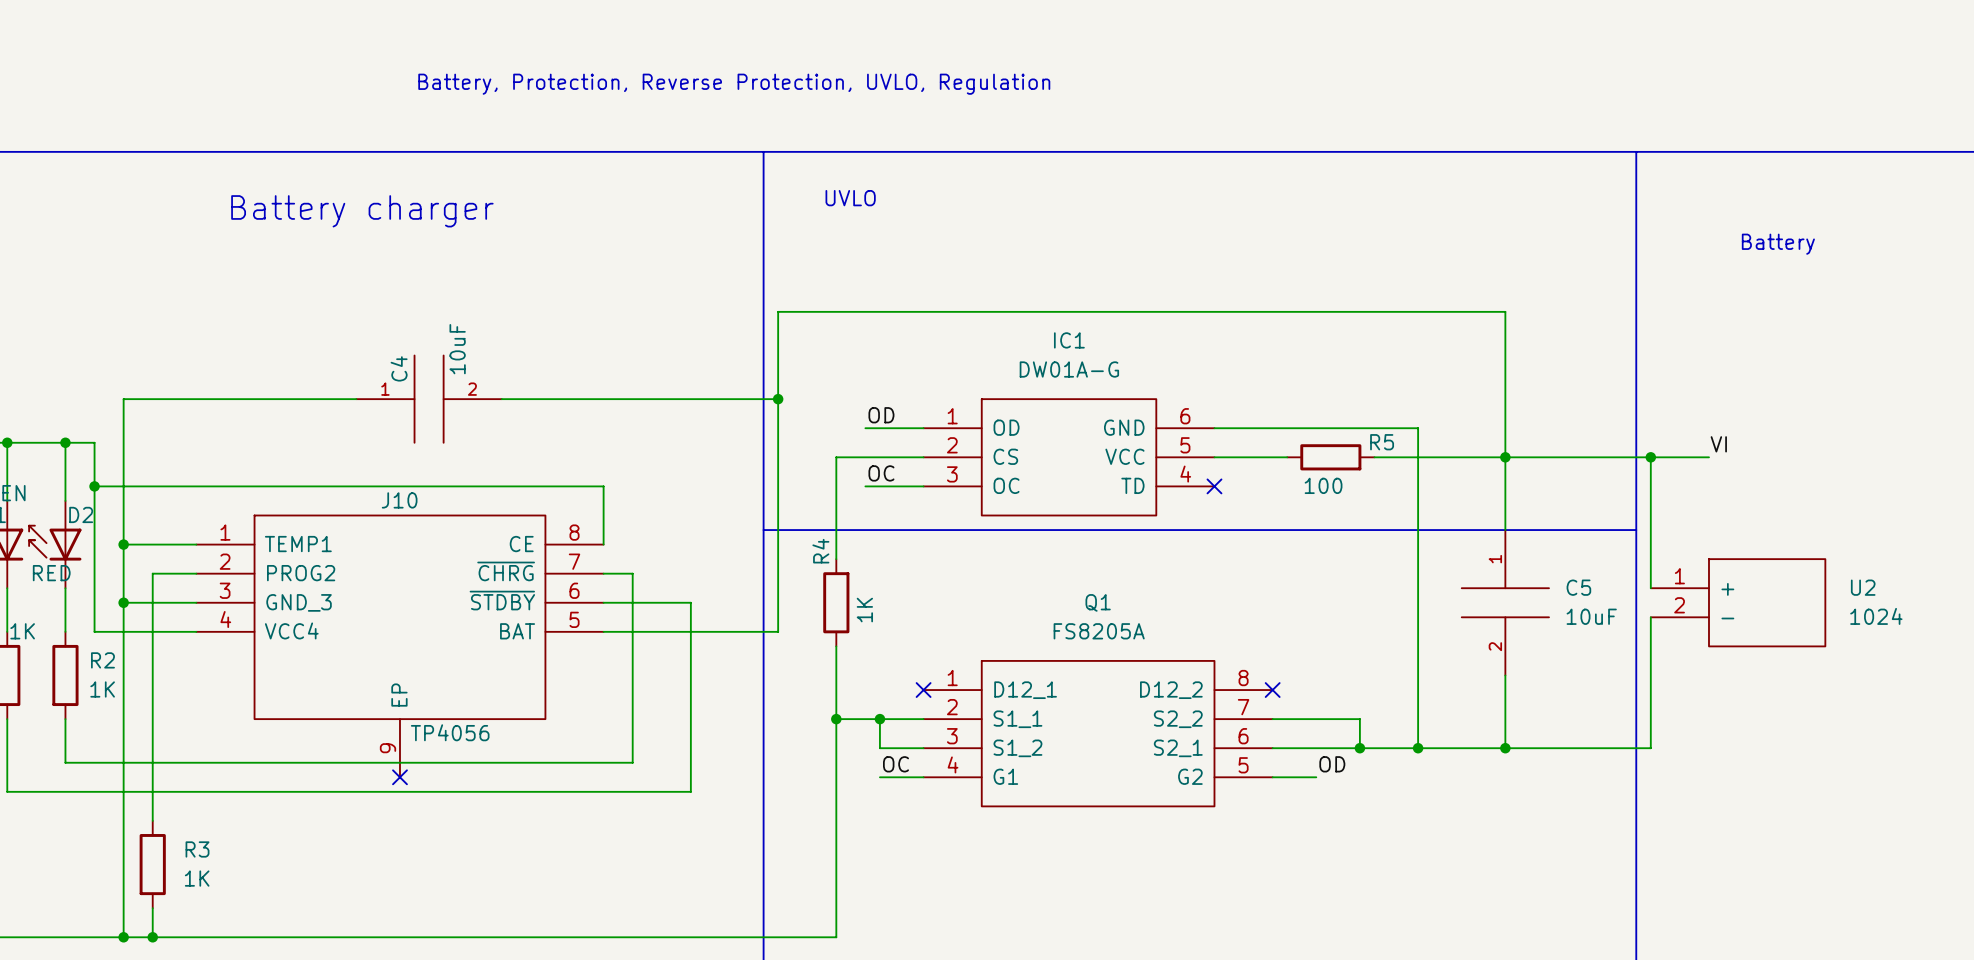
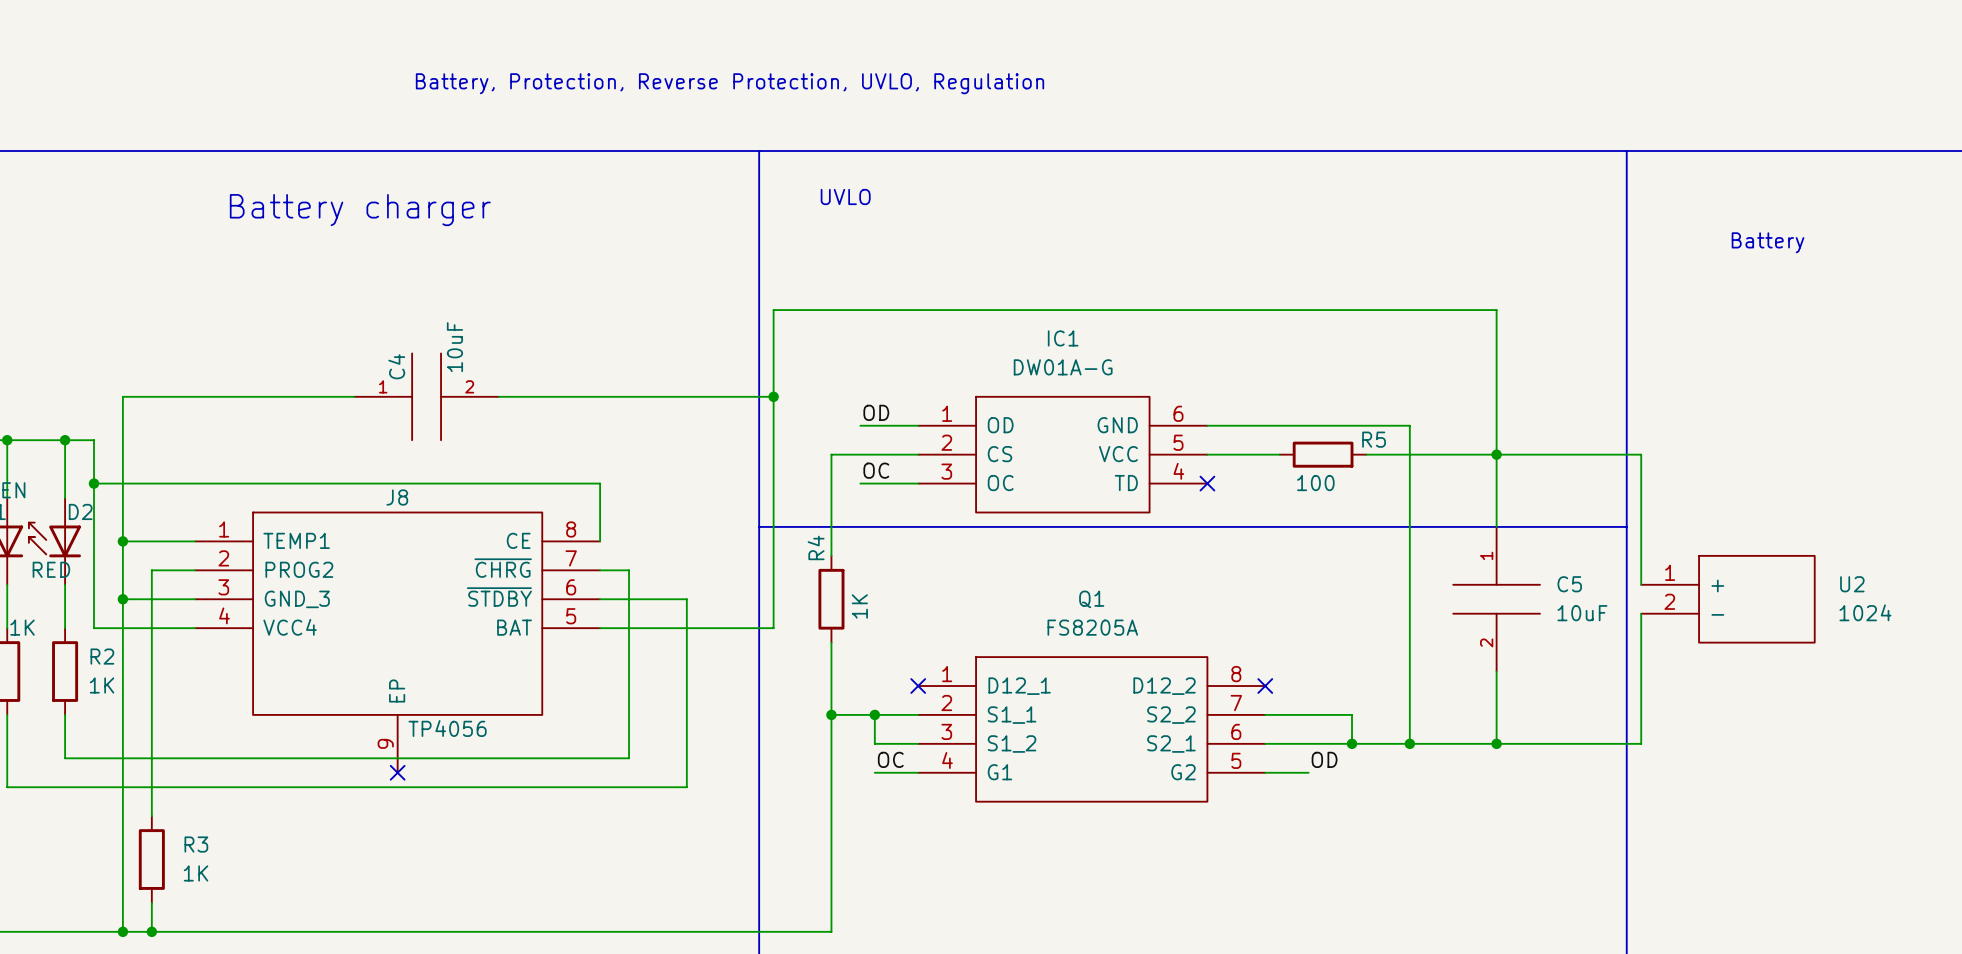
label: VI (1718, 444) -> none
wire: (1650, 457) (1708, 457) -> none
junction: (1650, 457) -> none
J10 name: J10 (399, 500) -> J8 (397, 497)

